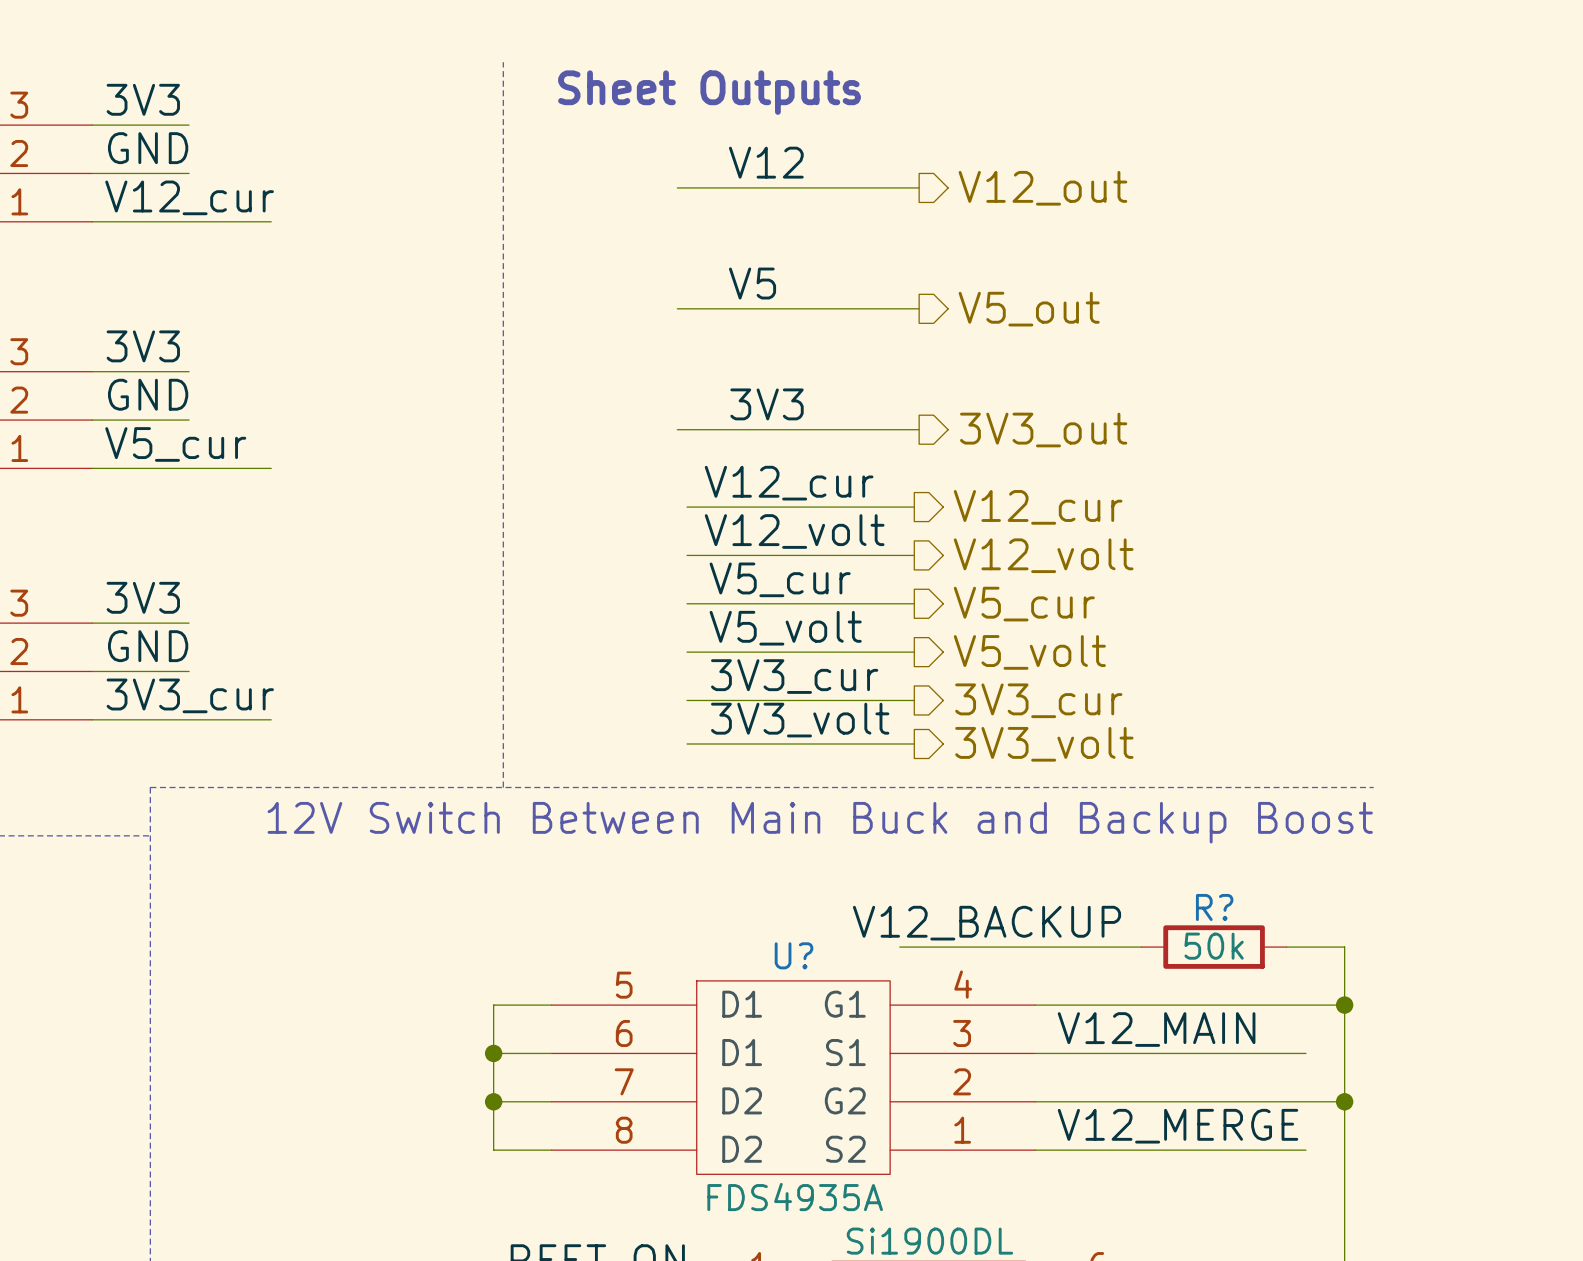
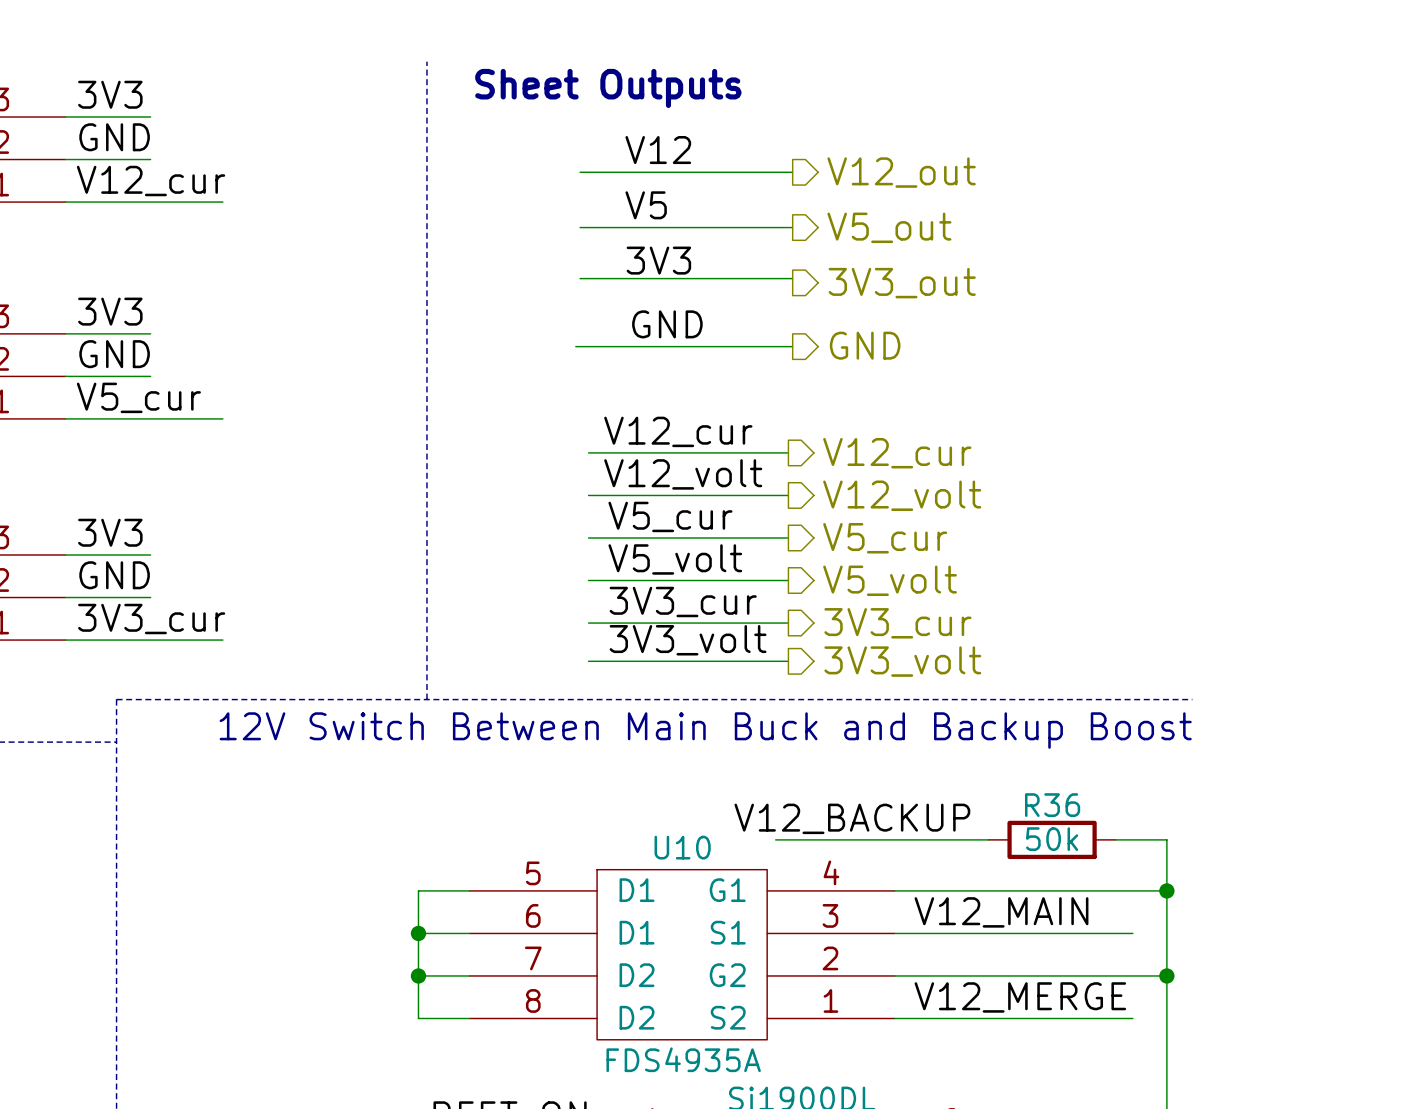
label: none -> V5 (646, 205)
hierarchical label: none -> V5_out (889, 227)
label: V5 (752, 283) -> 3V3 (658, 260)
hierarchical label: V5_out (1029, 309) -> 3V3_out (902, 283)
label: none -> GND (667, 324)
hierarchical label: none -> GND (865, 345)
wire: none -> (575, 346) (792, 346)
label: 3V3 (767, 404) -> none
wire: (677, 429) (919, 429) -> (580, 227) (792, 227)
hierarchical label: 3V3_out (1043, 430) -> none
R? name: R? (1214, 907) -> R36 (1052, 805)
U? name: U? (794, 955) -> U10 (682, 847)

